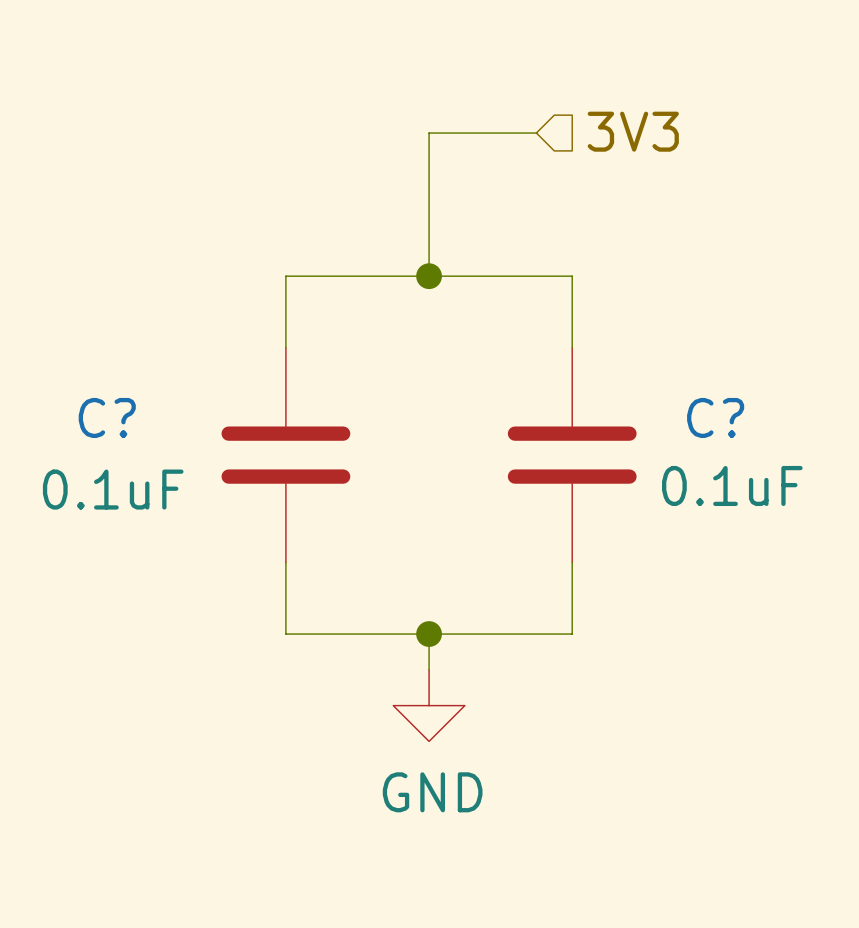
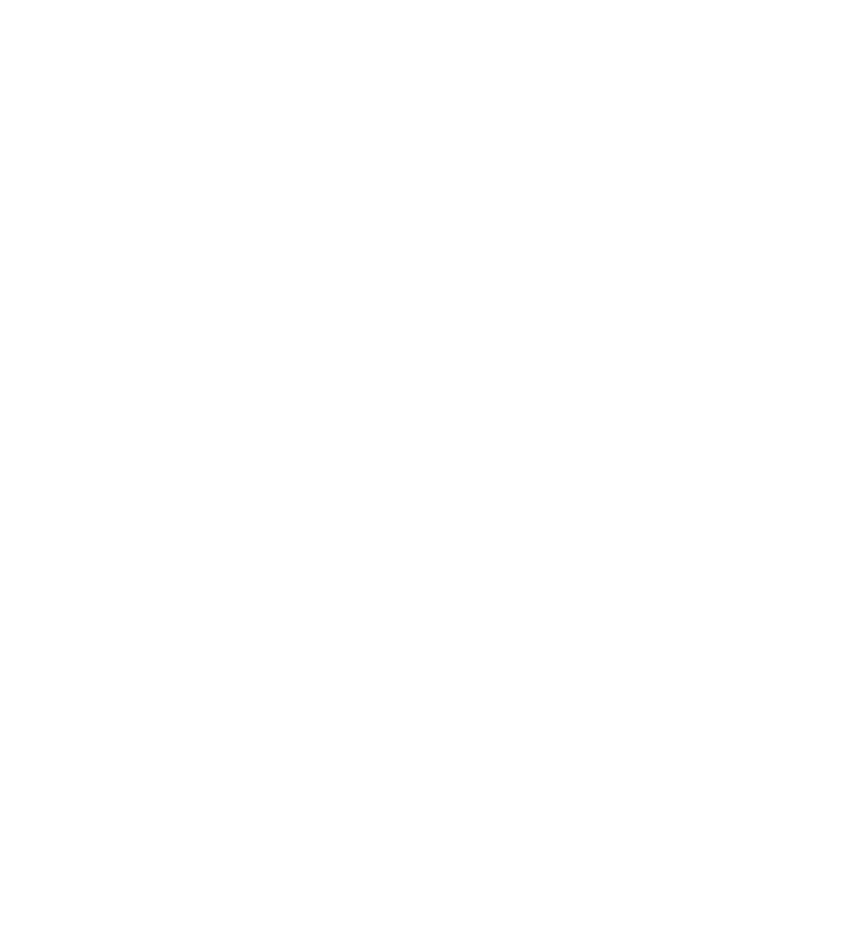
hierarchical label: 3V3 (633, 131) -> none
wire: (536, 133) (429, 133) (429, 276) -> none
junction: (429, 276) -> none
wire: (285, 347) (285, 276) (572, 276) (572, 347) -> none
C?: 0.1uF (285, 455) -> none
C?: 0.1uF (572, 455) -> none
wire: (285, 562) (285, 634) (572, 634) (572, 562) -> none
wire: (429, 634) (429, 669) -> none
junction: (429, 634) -> none
power symbol: GND (429, 705) -> none

